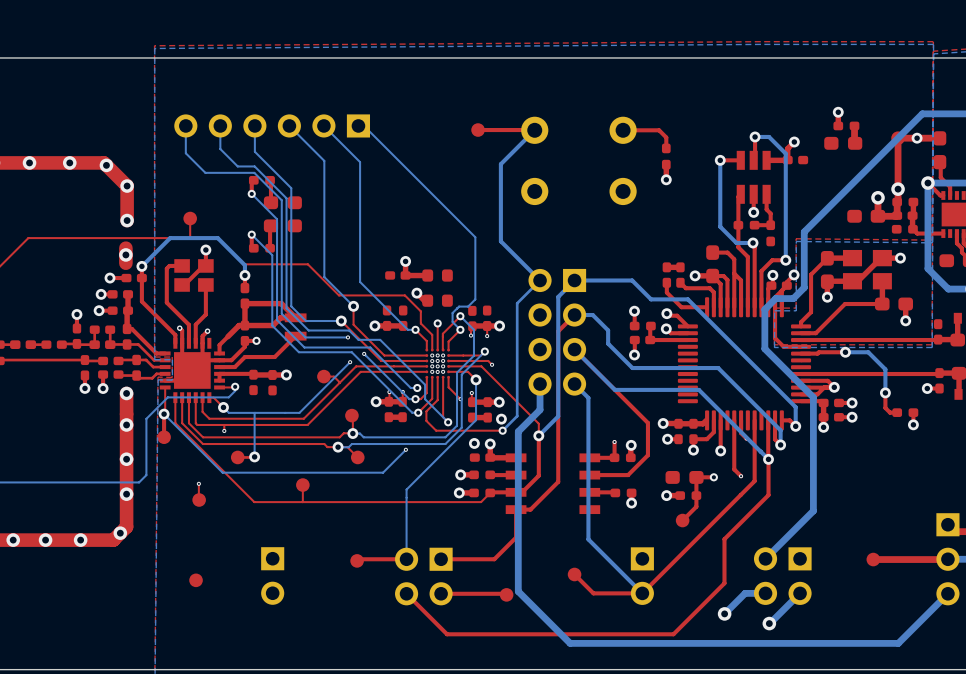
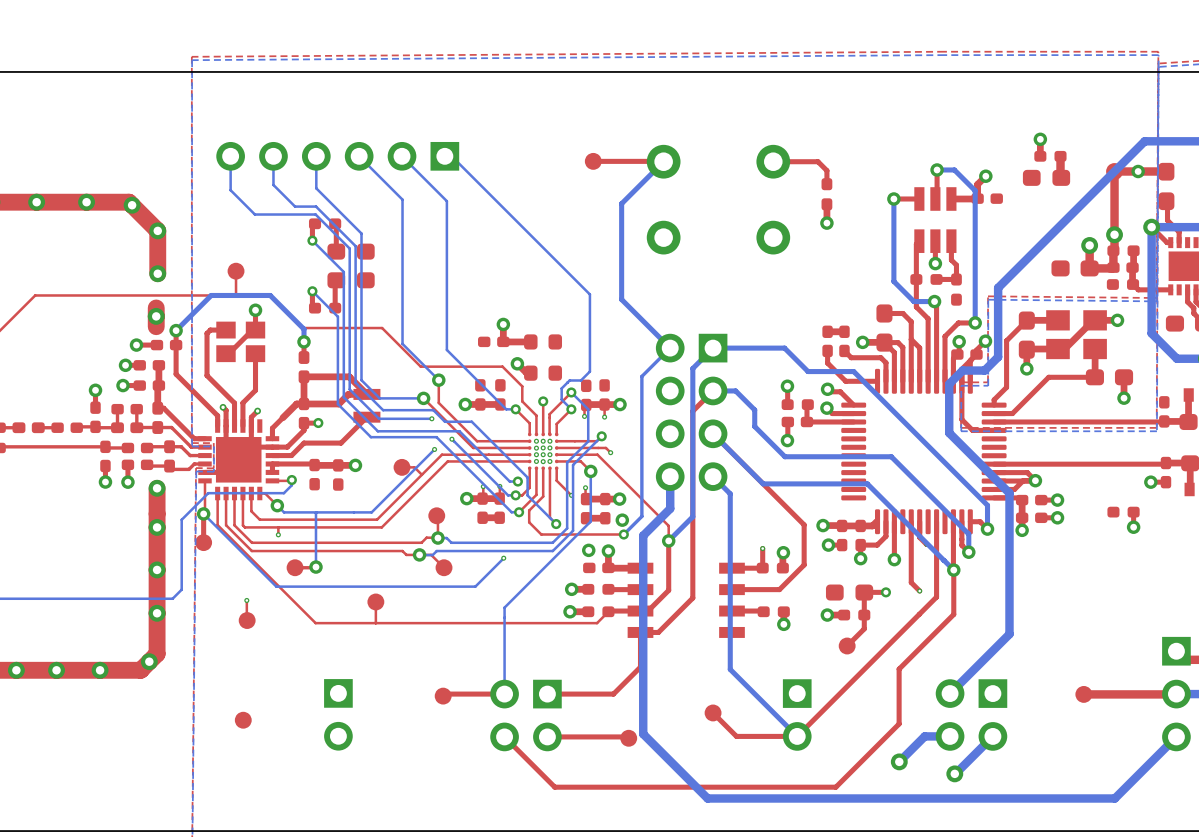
top track: (845, 352) (801, 354) -> none
bottom track: (845, 352) (868, 352) (885, 369) (885, 392) -> none
via: (845, 352) -> none
top track: (885, 392) (885, 407) (890, 412) (897, 412) -> none
via: (885, 392) -> none

